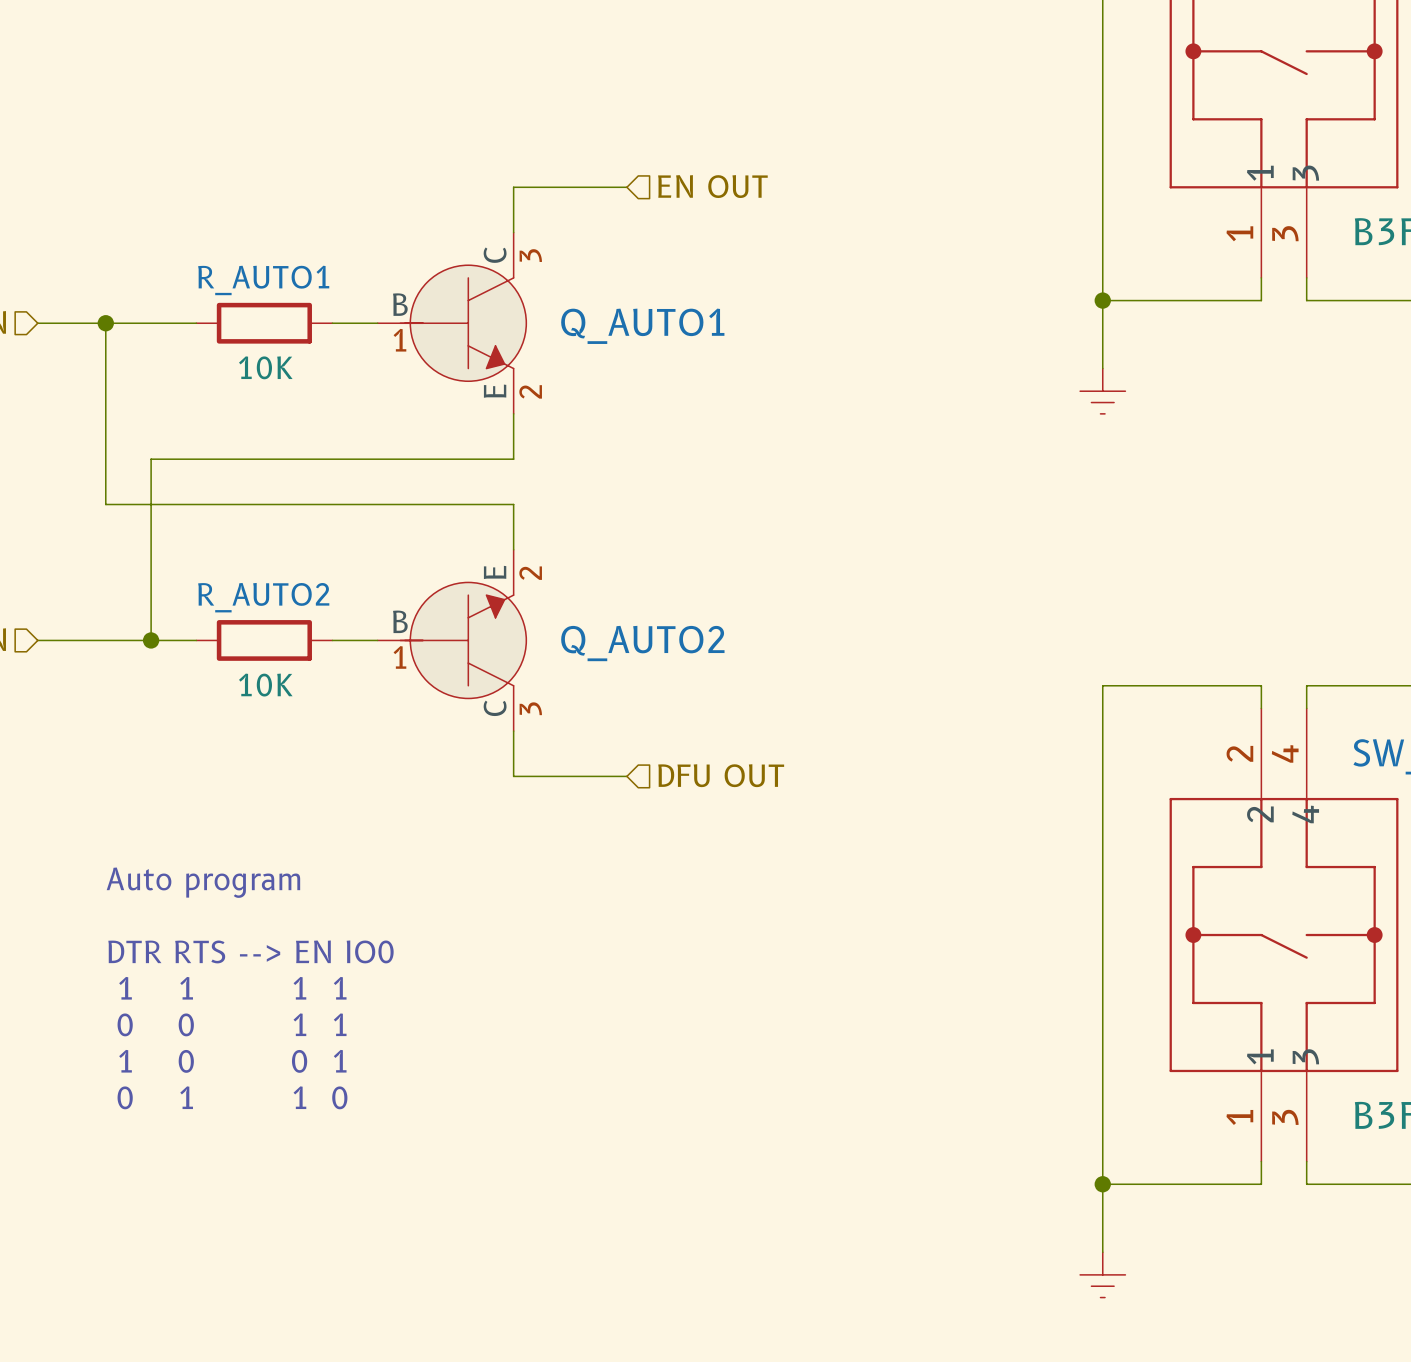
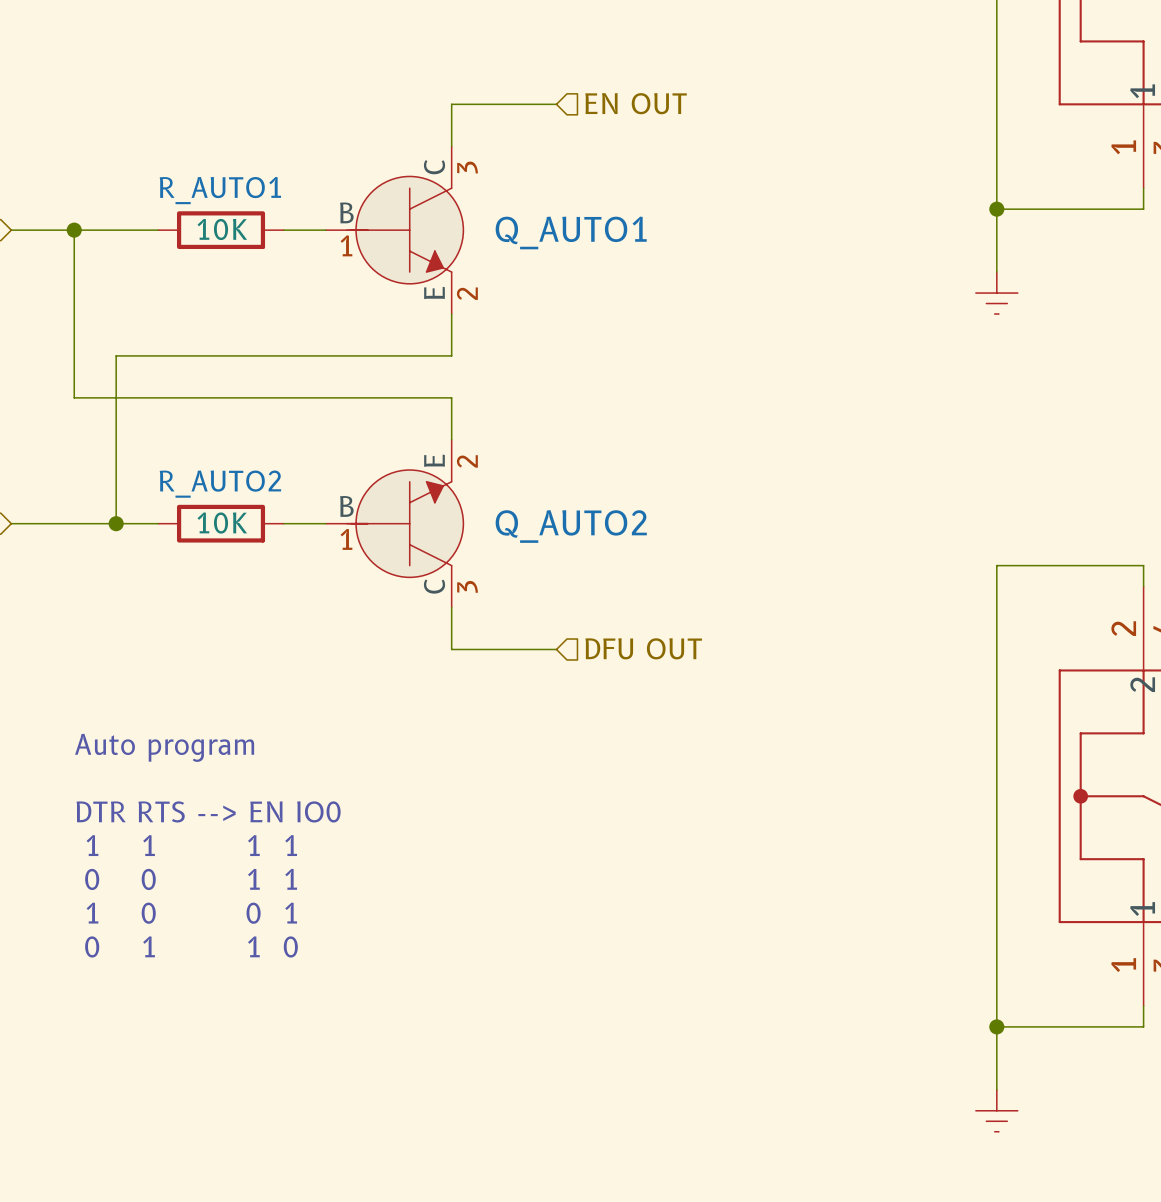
R_AUTO1 value position: 10K (265, 367) -> 10K (222, 229)
R_AUTO2 value position: 10K (265, 685) -> 10K (222, 523)

